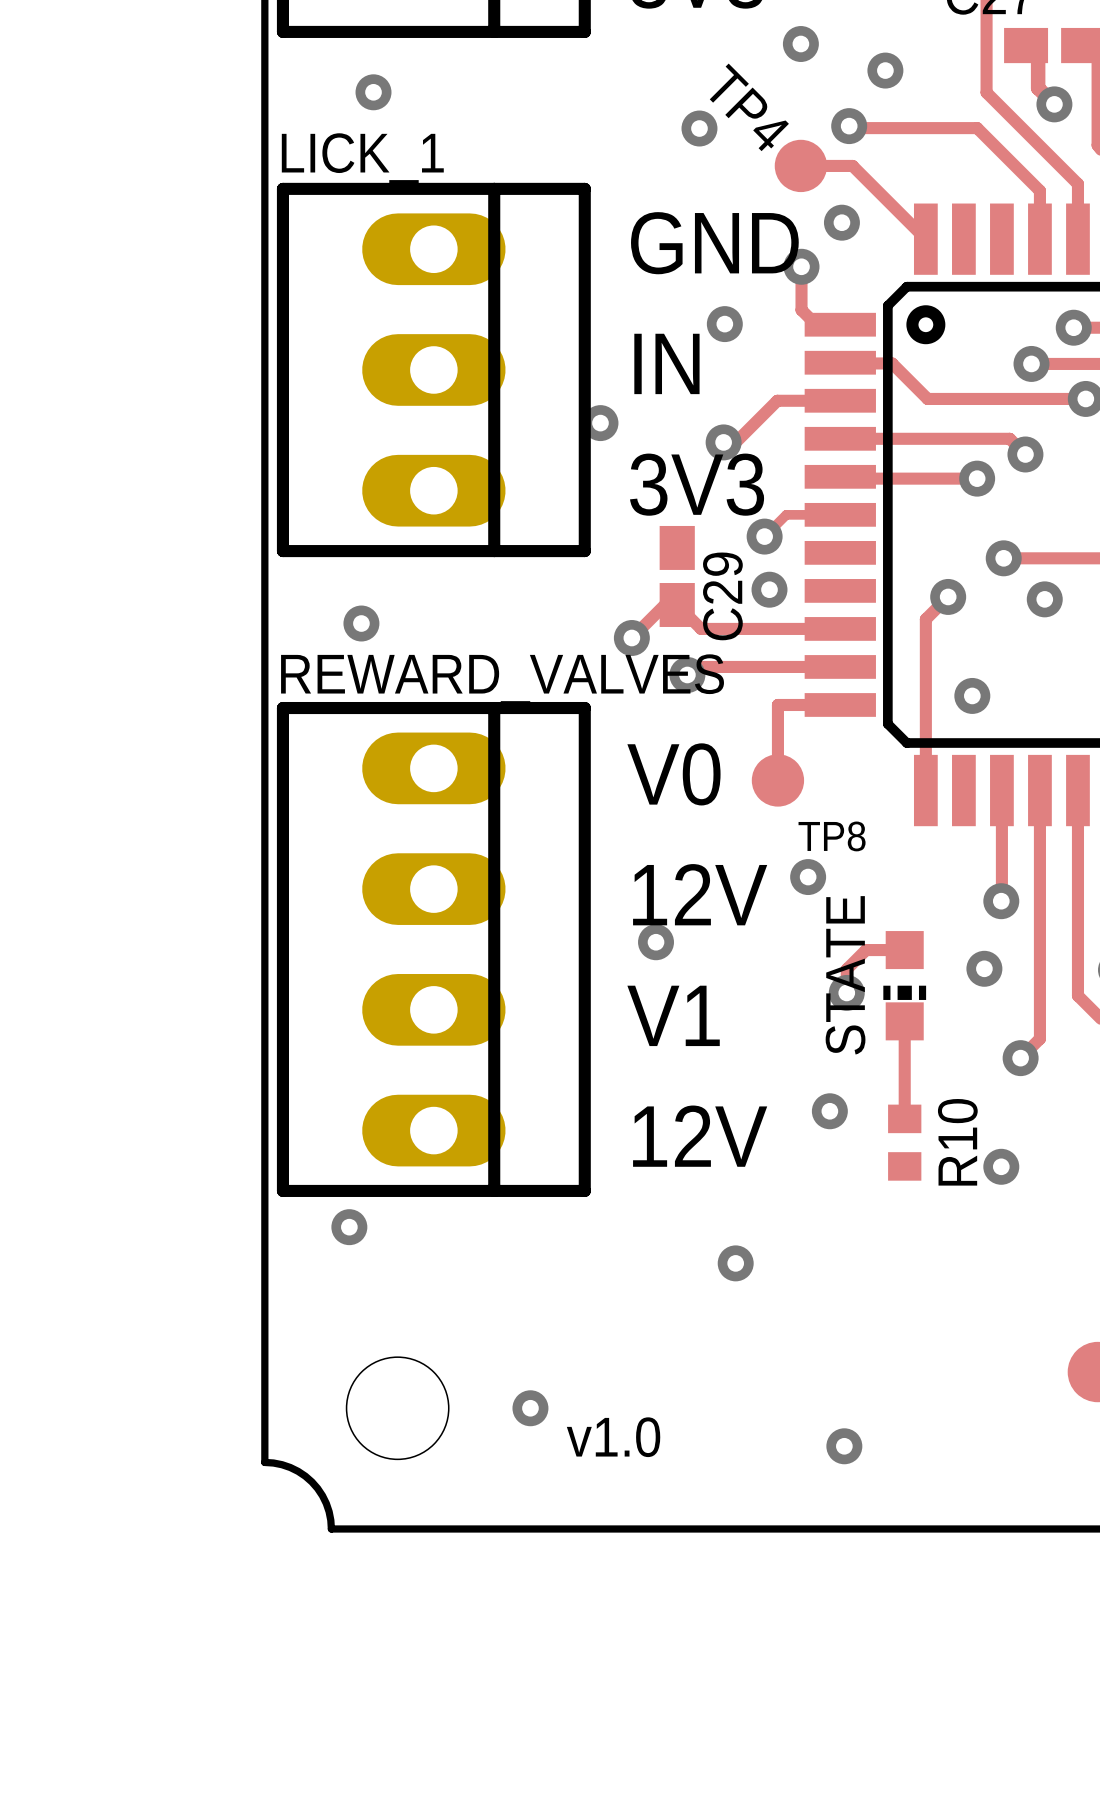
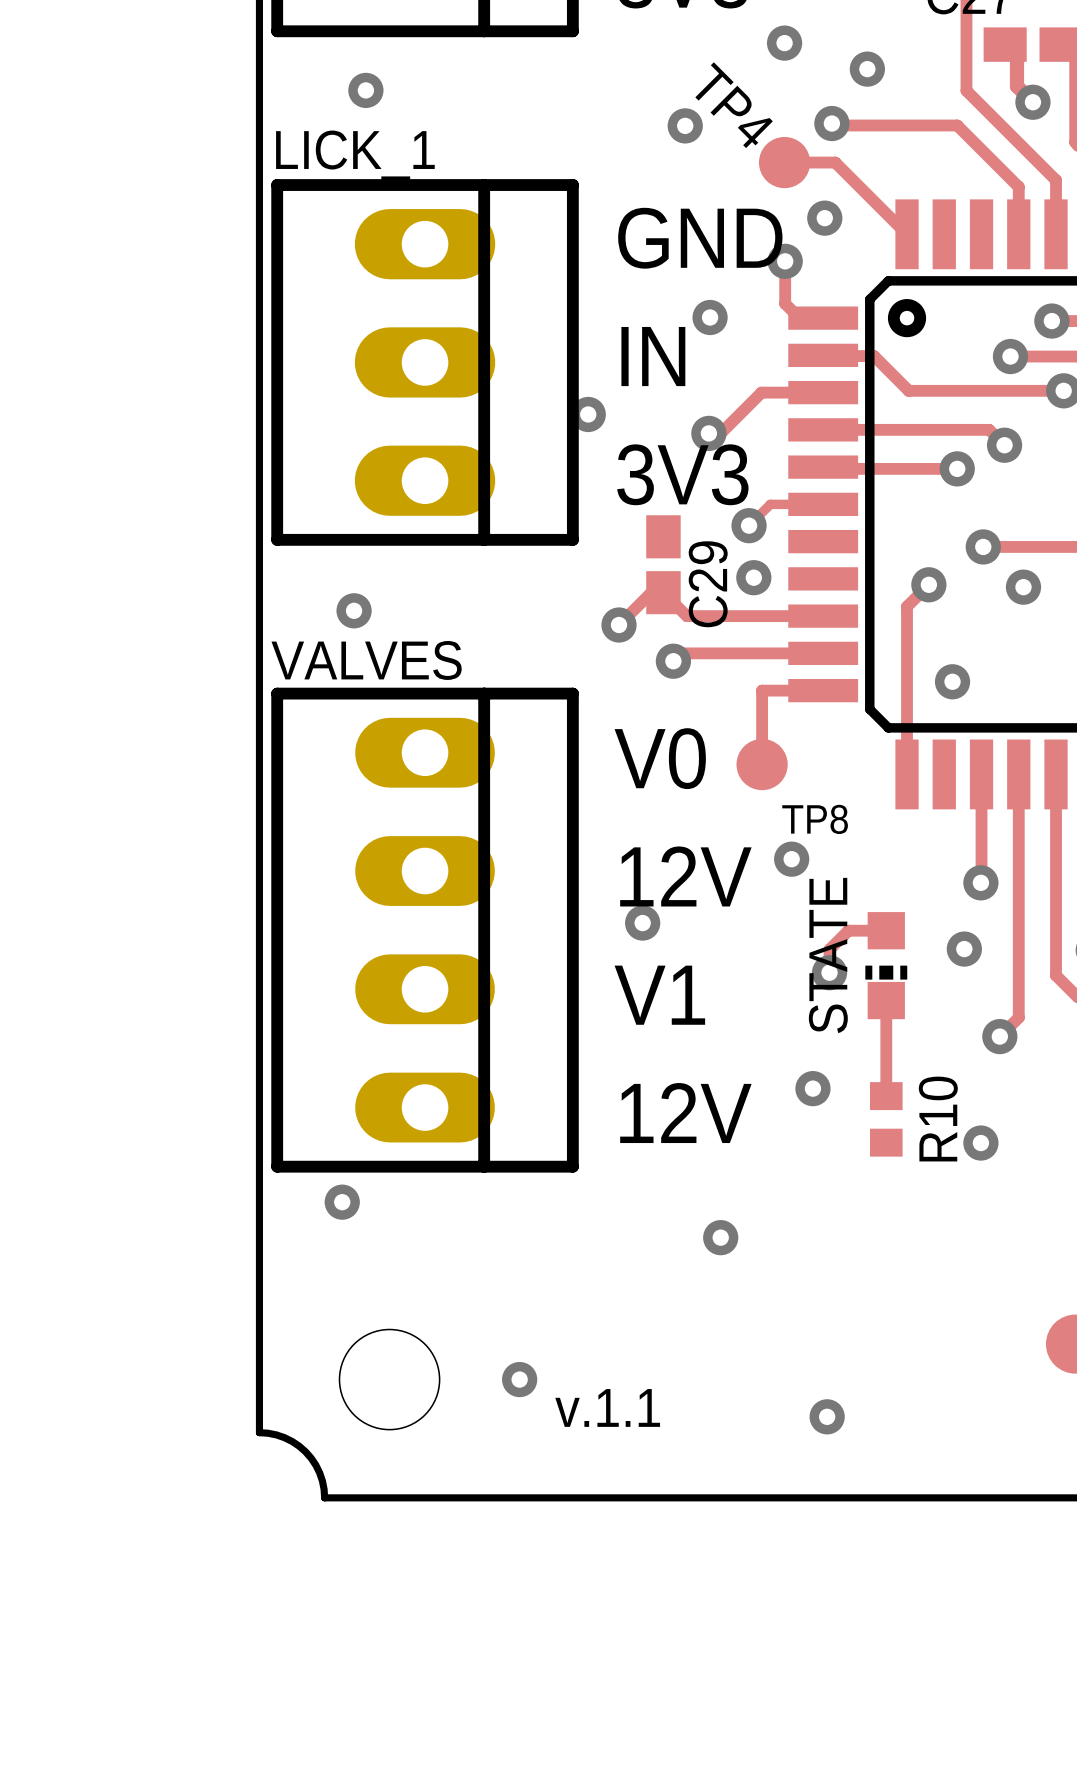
REWARD_VALVES: (433, 949) -> none
VALVES: none -> (425, 930)
text: v1.0 (613, 1437) -> v.1.1 (607, 1407)

